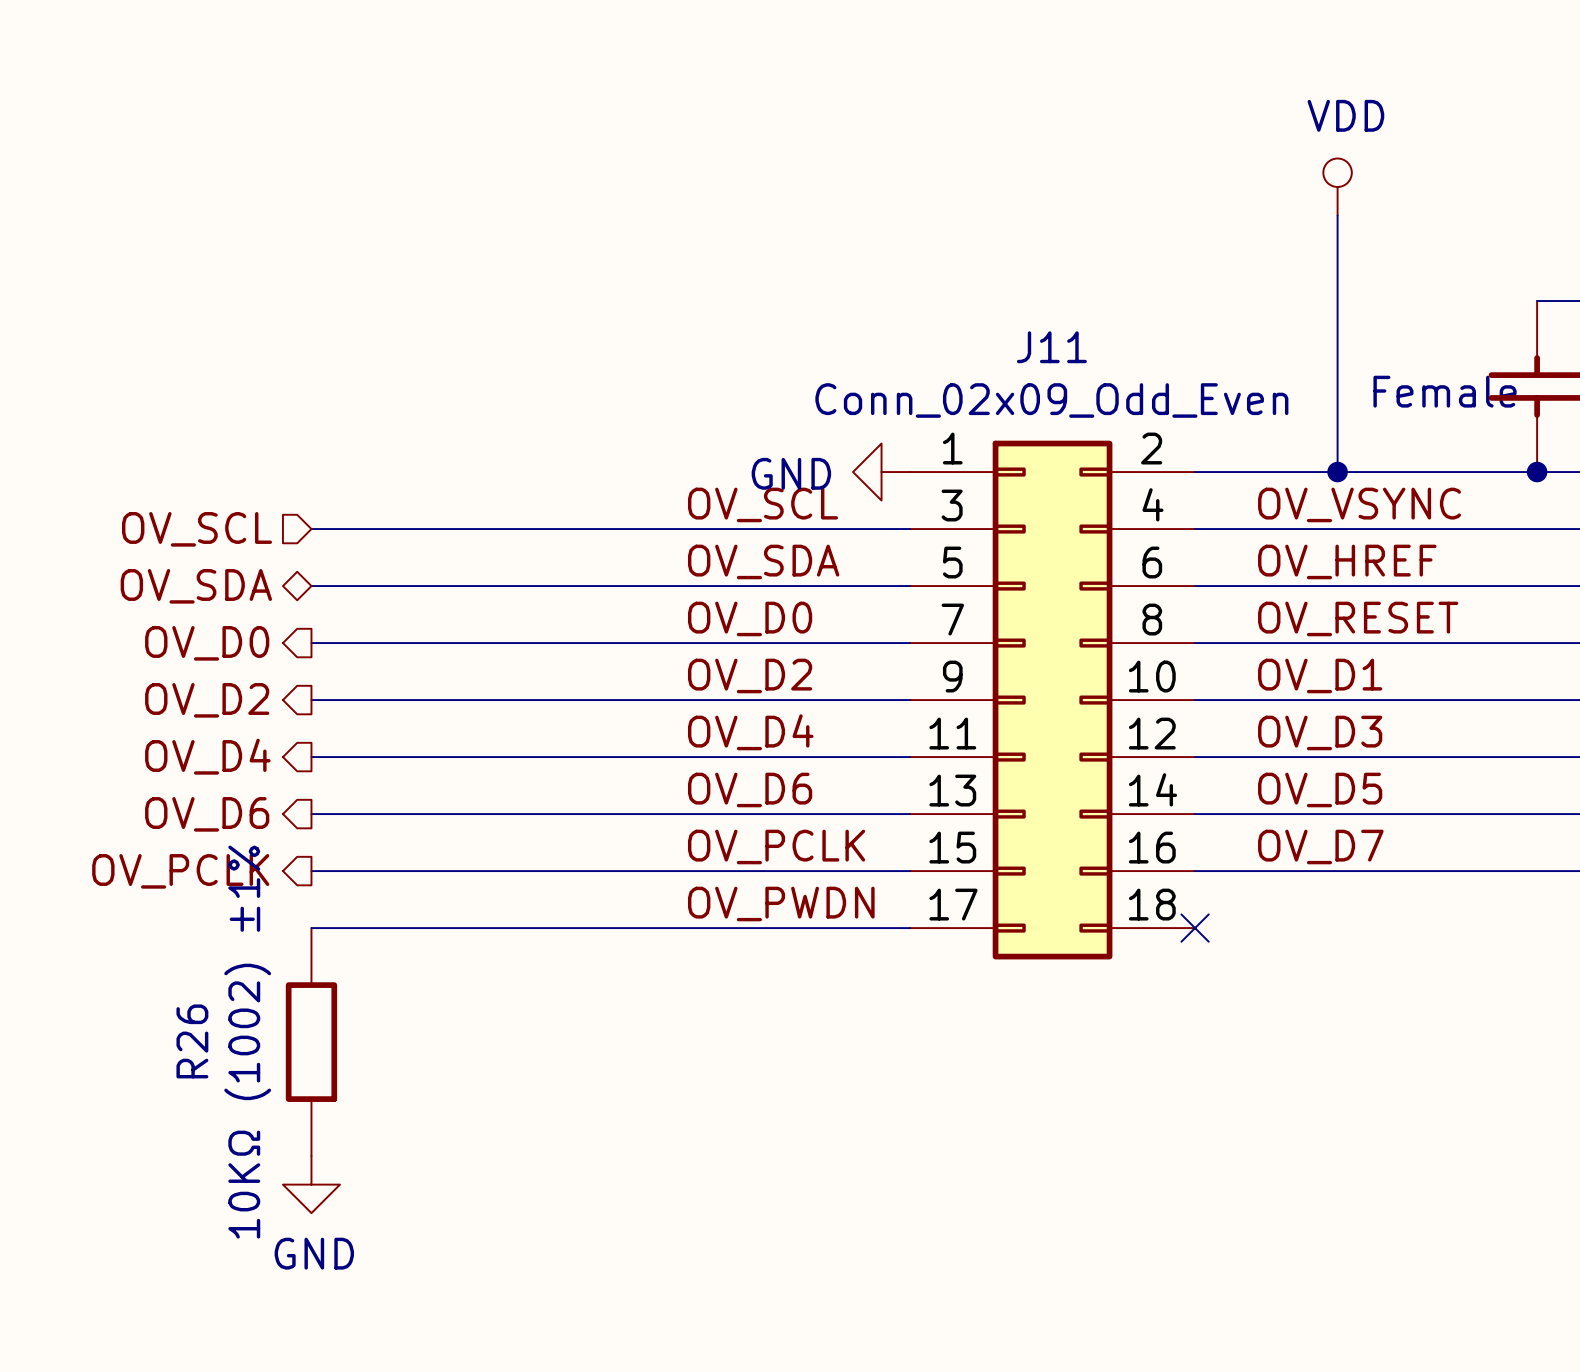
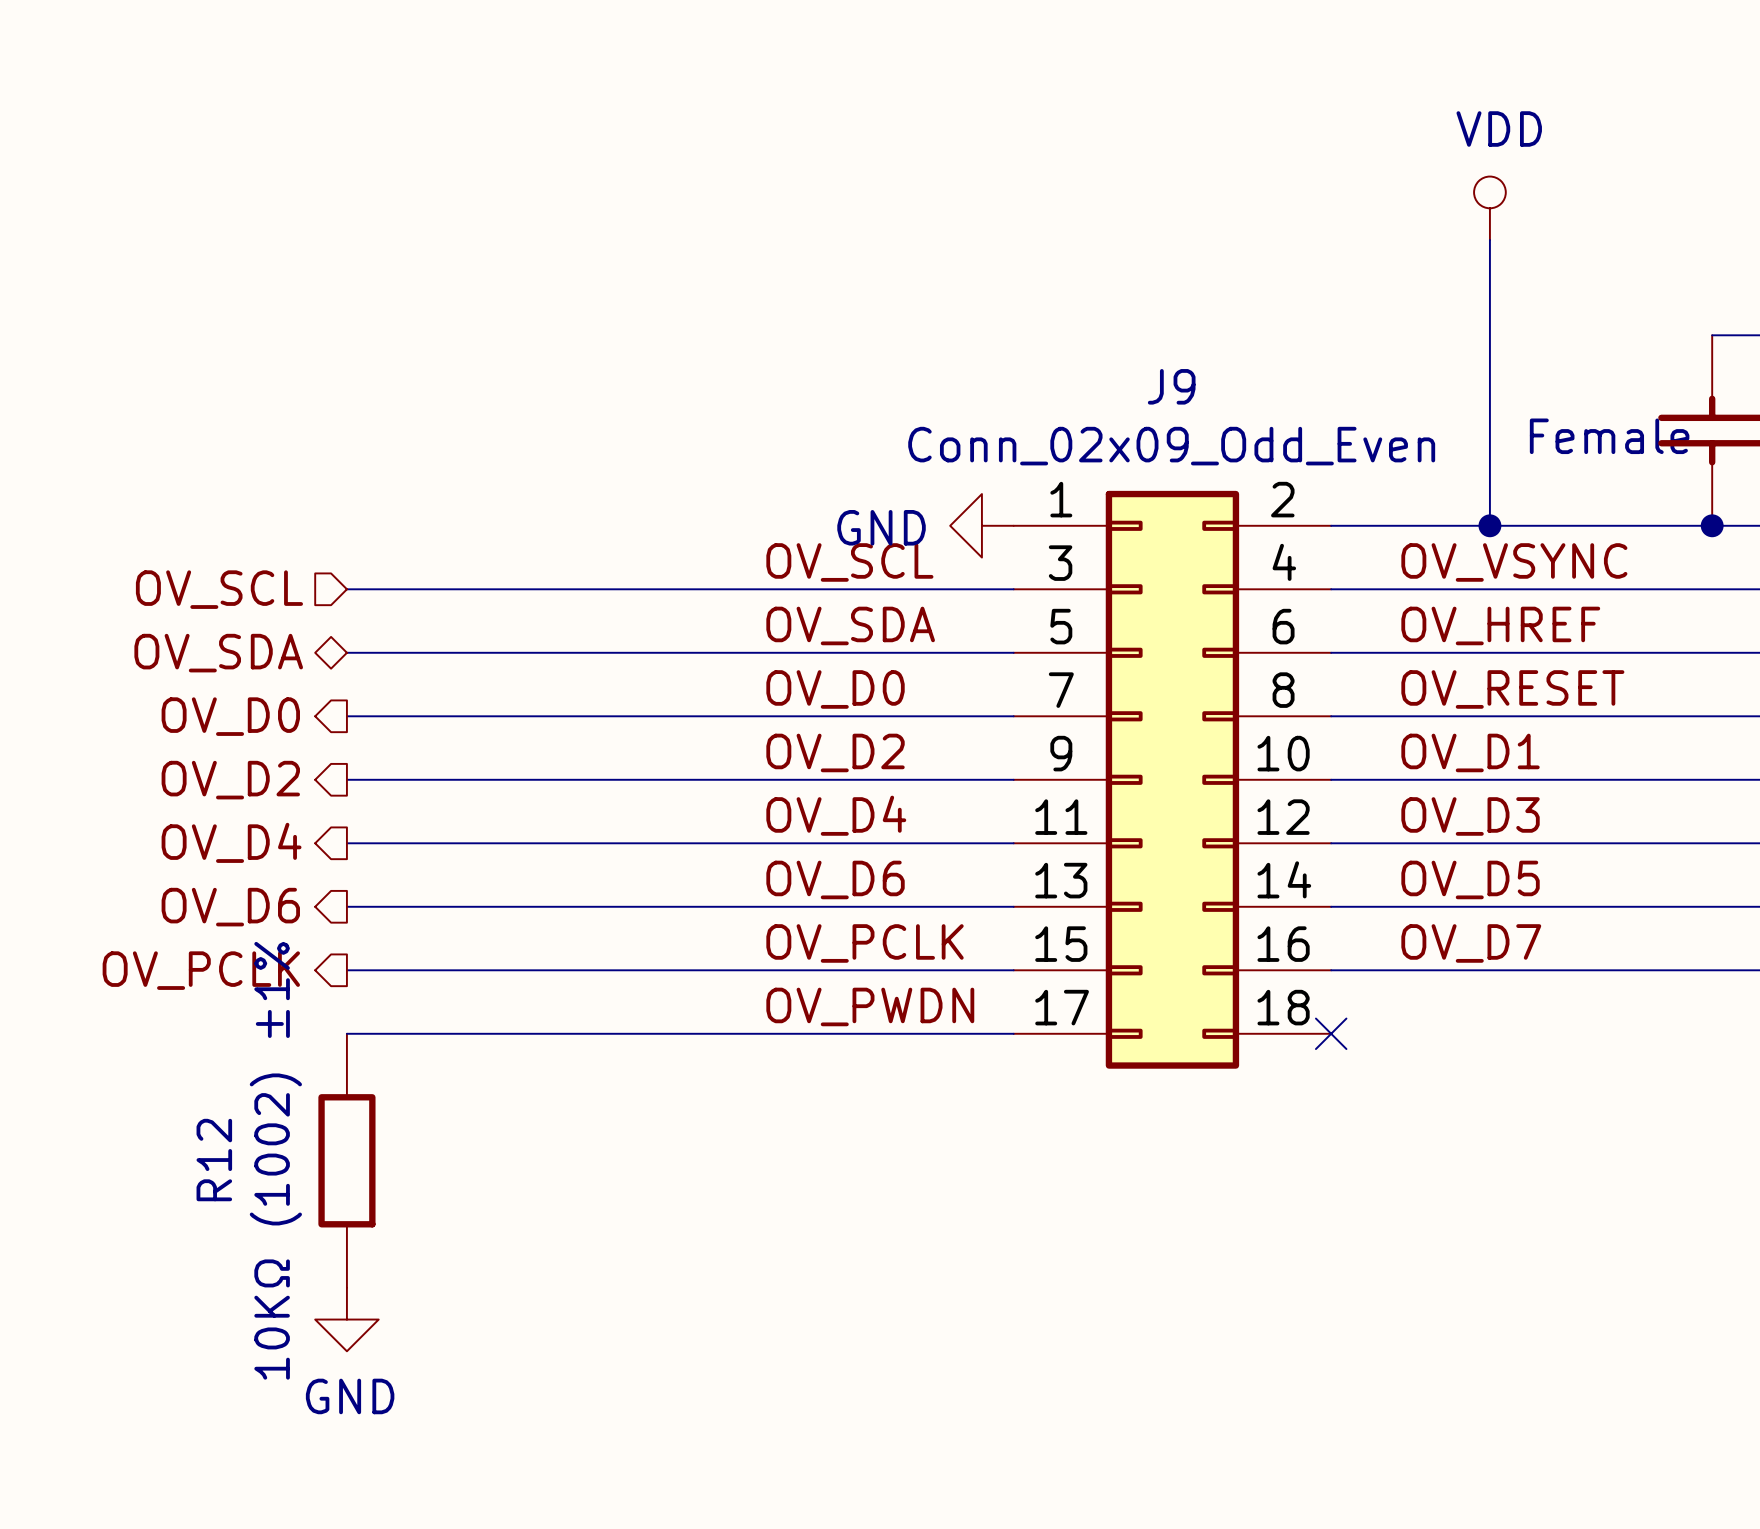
J11 name: J11 (1051, 347) -> J9 (1171, 386)
R26 name: R26 (192, 1041) -> R12 (214, 1160)

